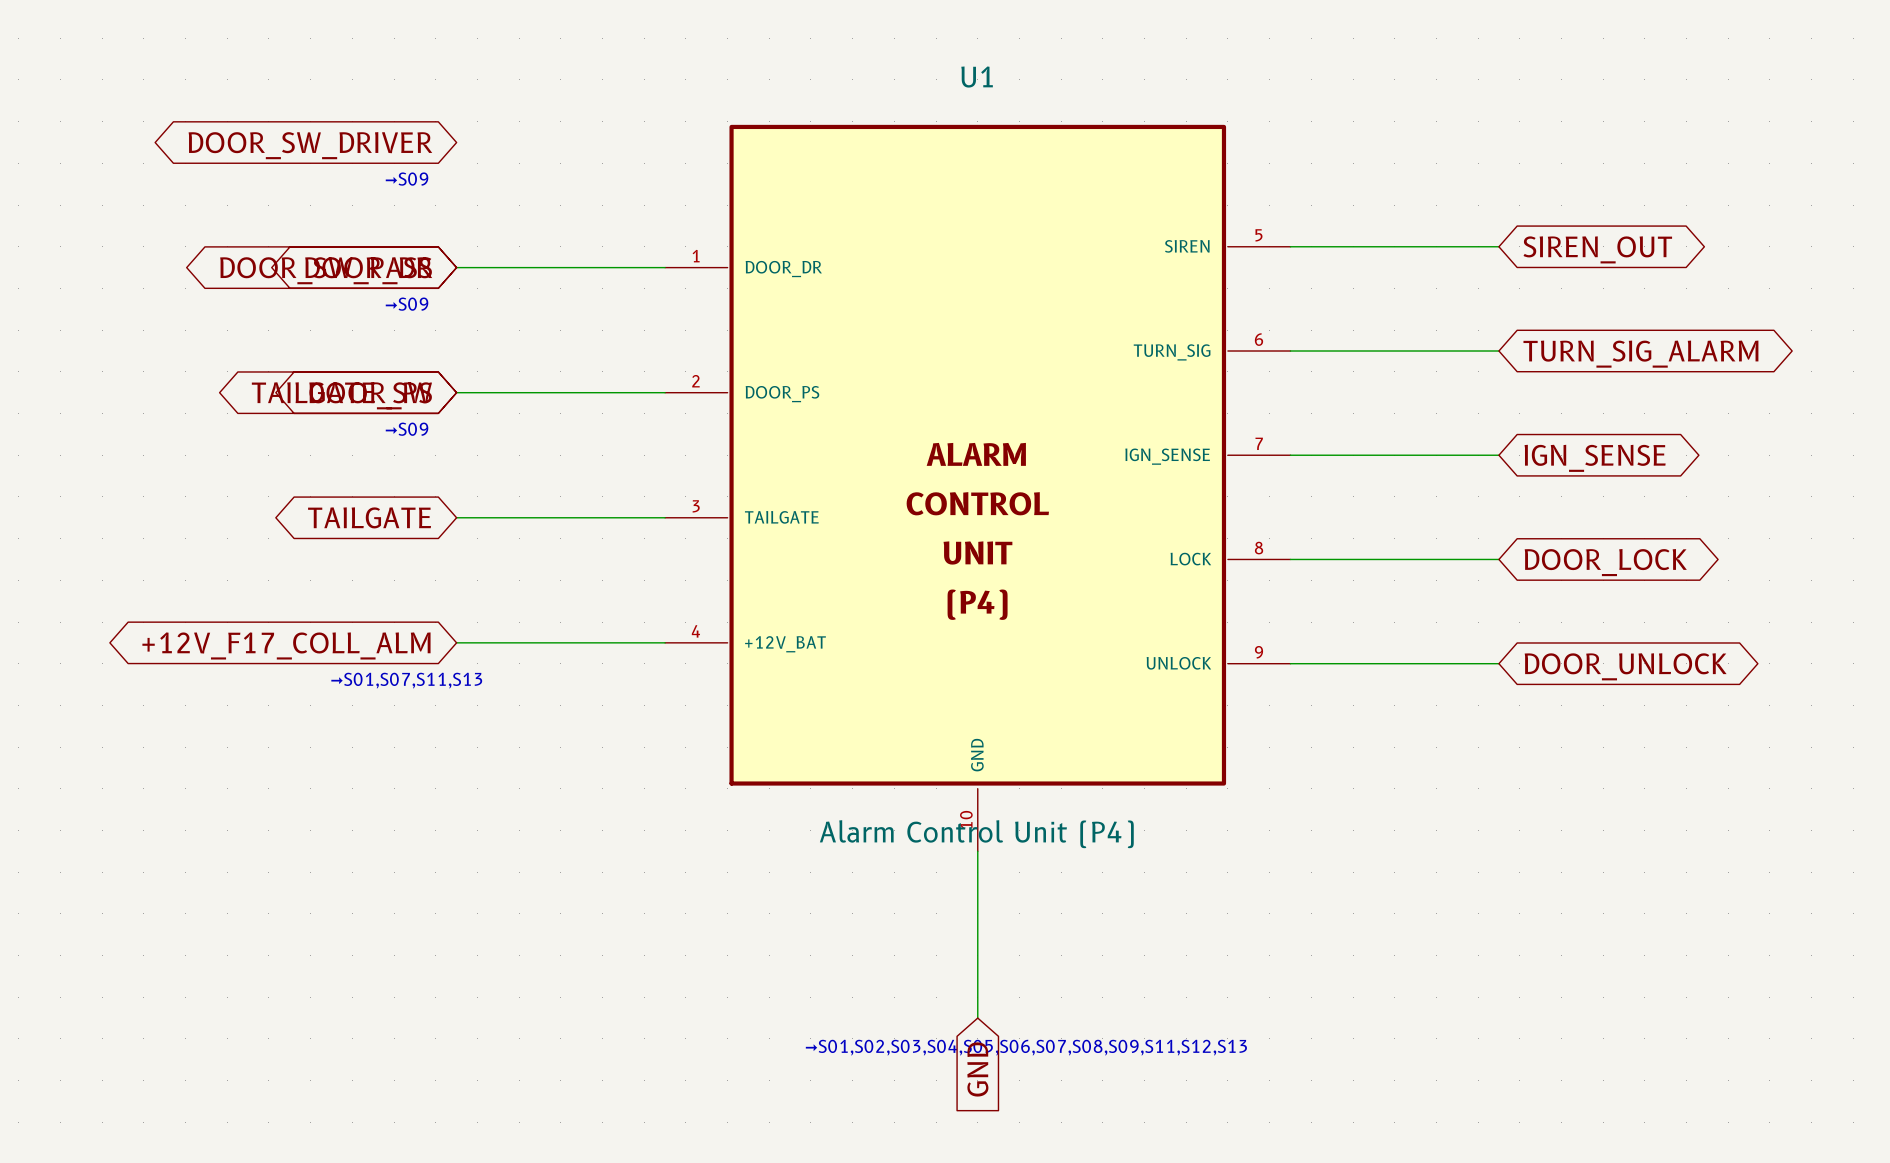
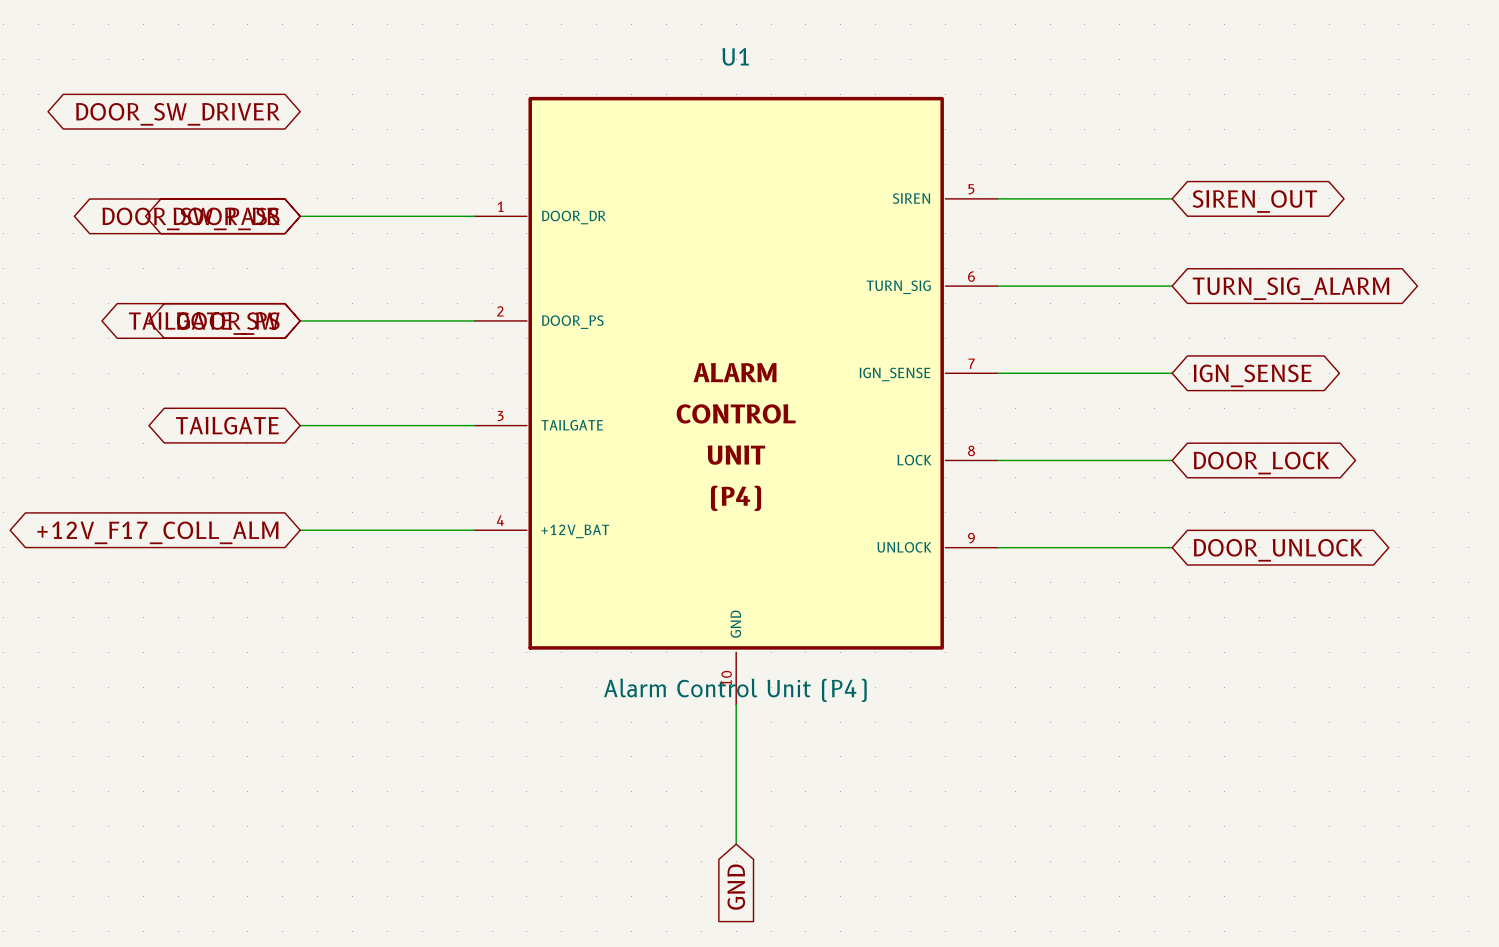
text: →S09 (407, 179) -> none
text: →S09 (407, 304) -> none
text: →S09 (407, 429) -> none
text: →S01,S07,S11,S13 (406, 680) -> none
text: →S01,S02,S03,S04,S05,S06,S07,S08,S09,S11,S12,S13 (1026, 1047) -> none

